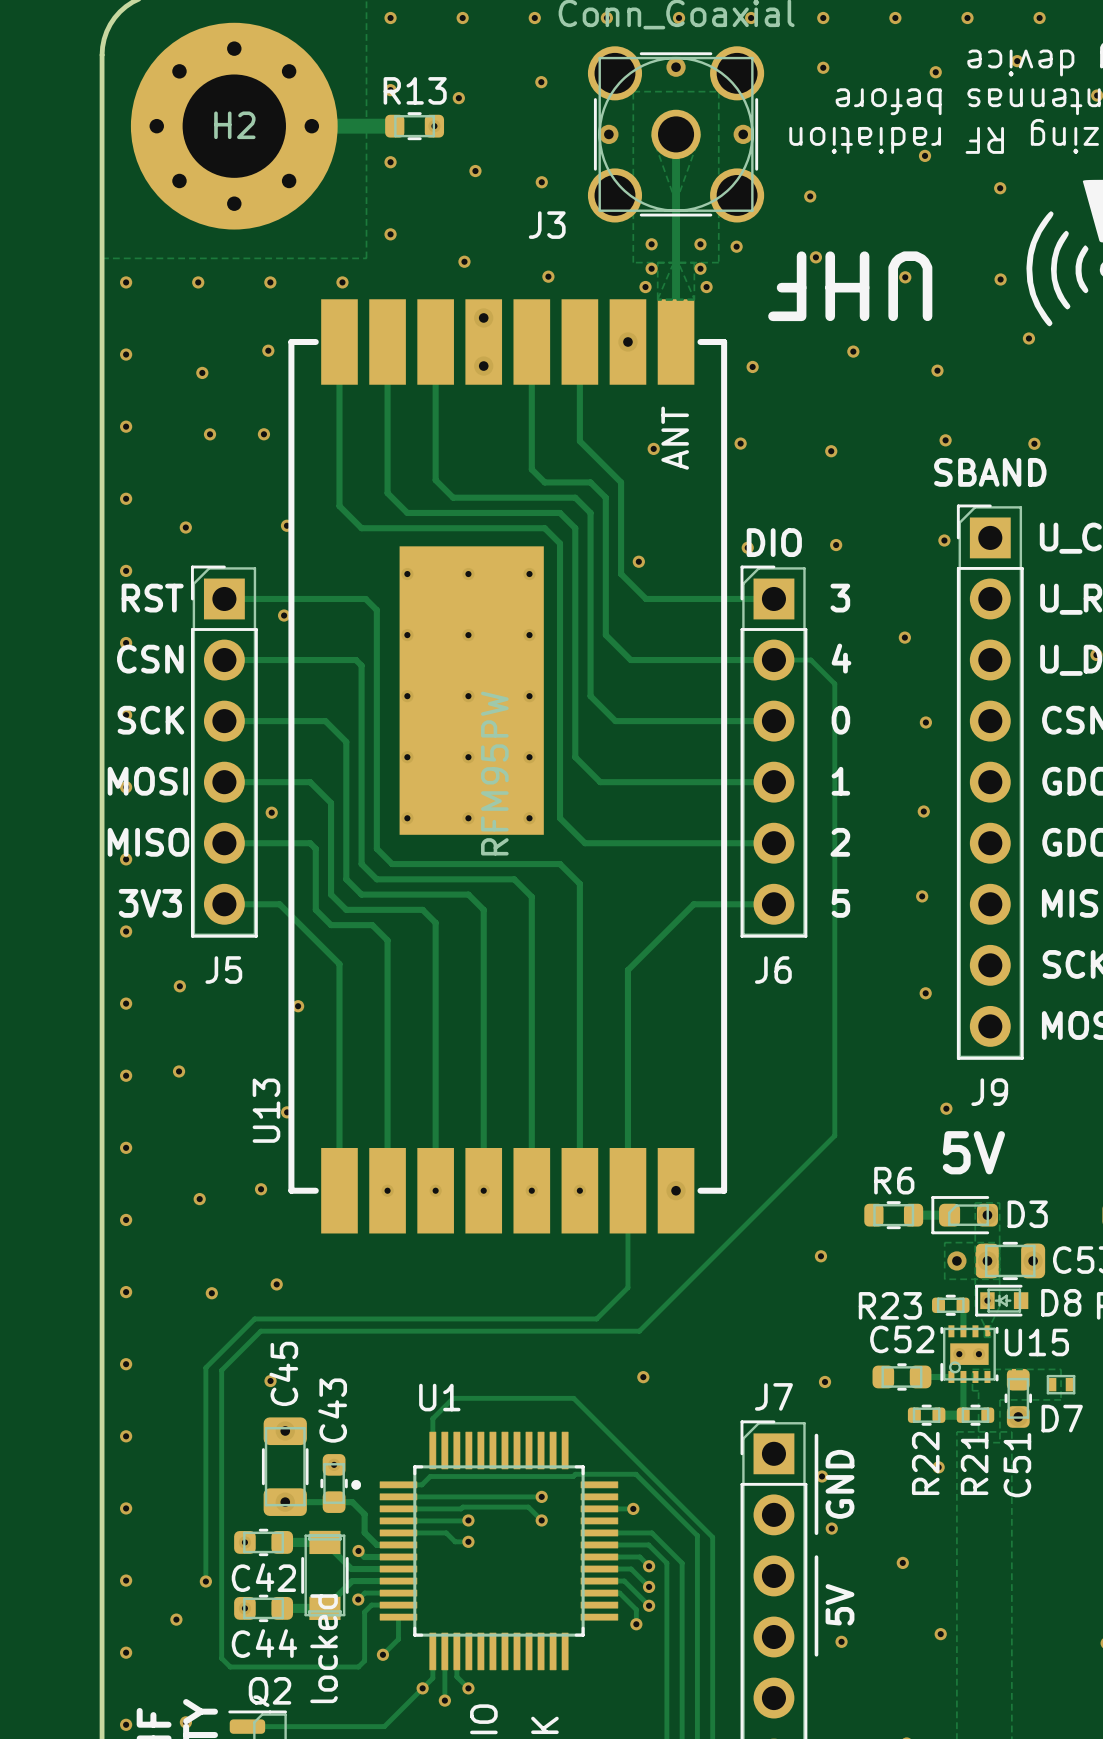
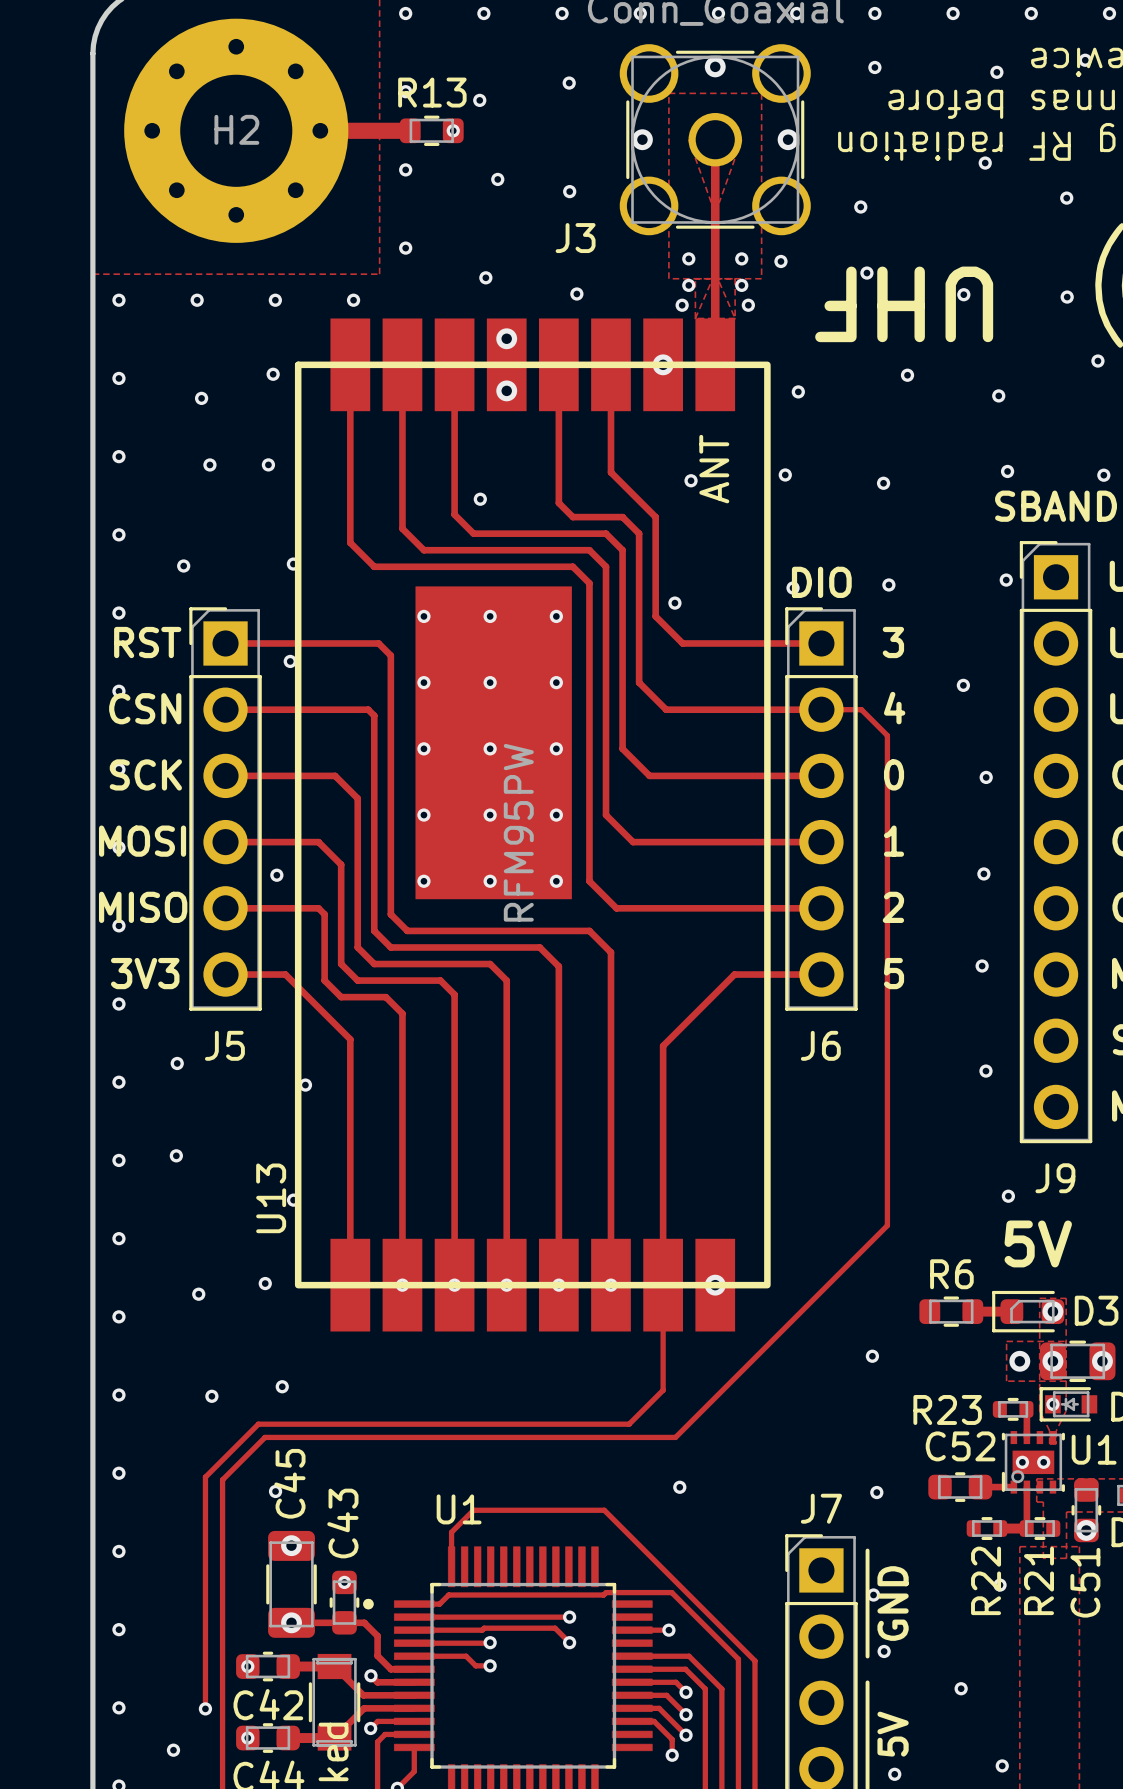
U13 footprint: [288, 299, 728, 1234] -> [294, 318, 771, 1332]
via: none -> (480, 499)

